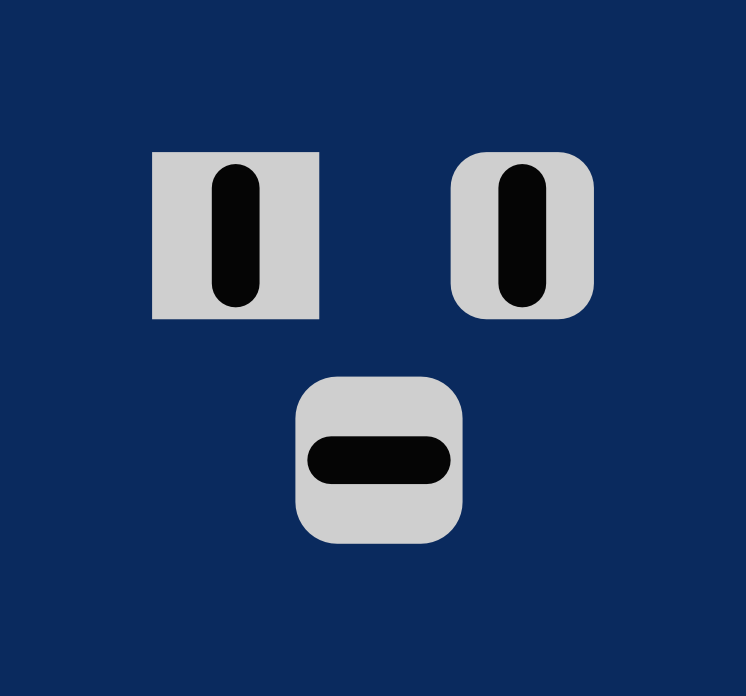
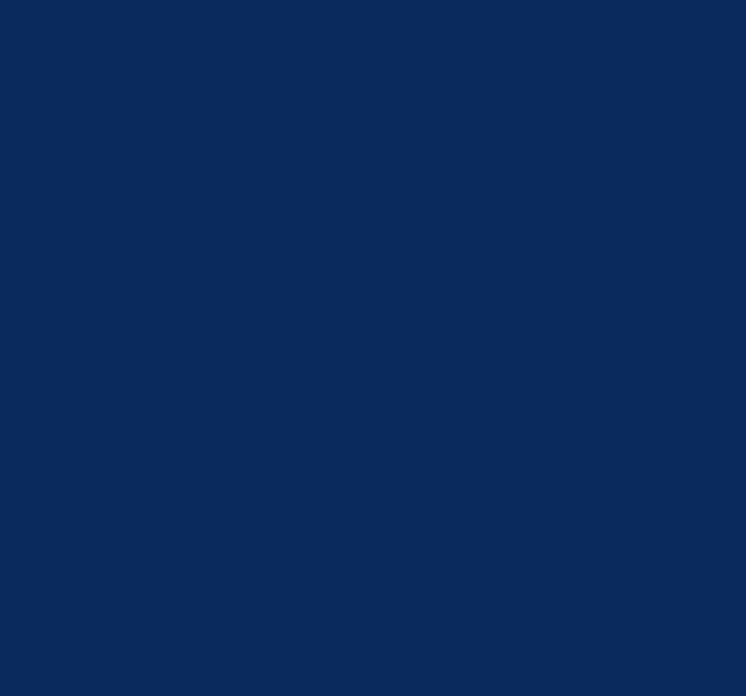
part: (373, 347) -> none

